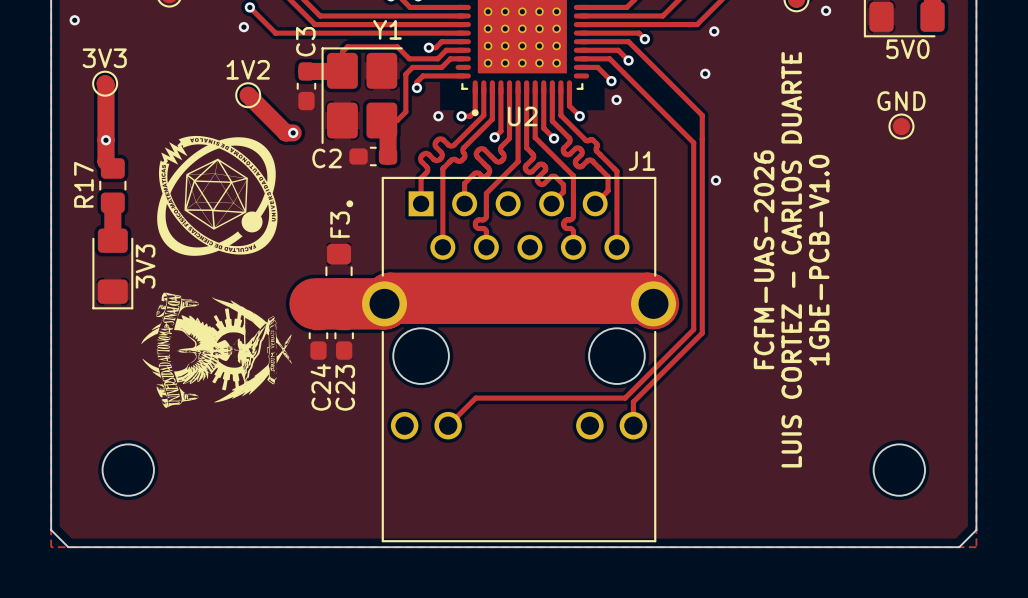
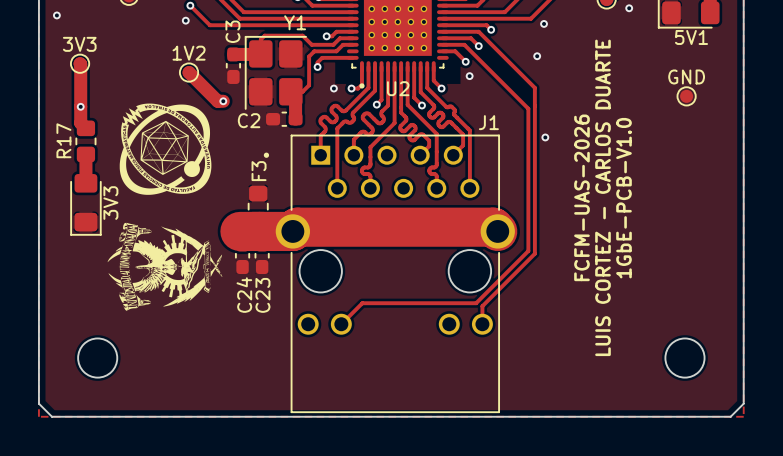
5V0 name: 5V0 (907, 49) -> 5V1 (691, 37)

